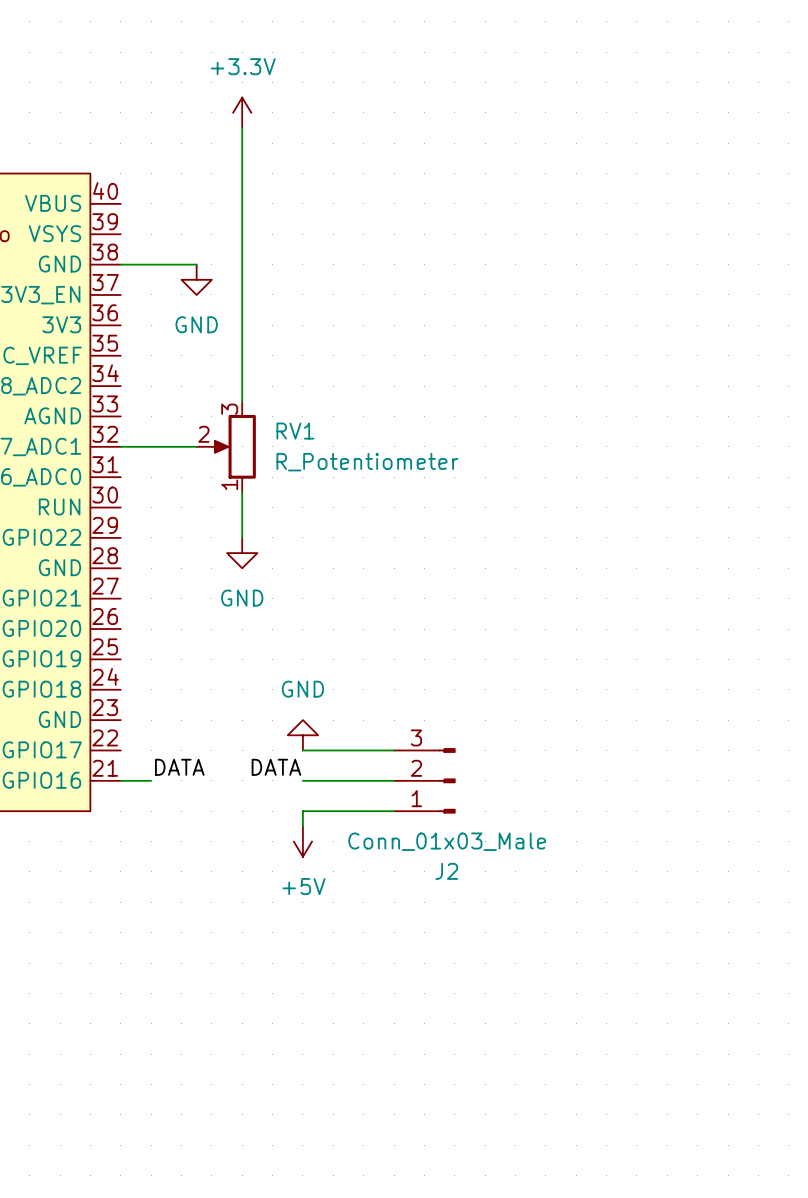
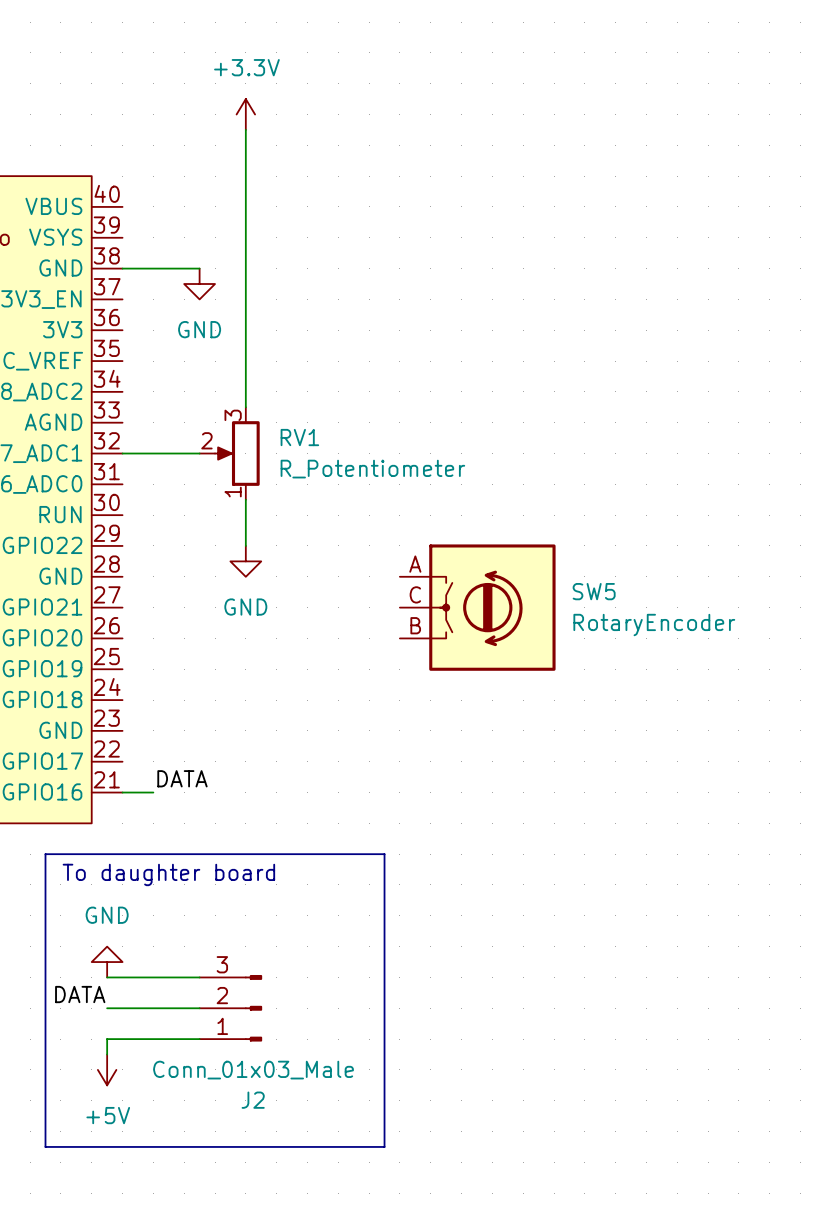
SW5: none -> RotaryEncoder (477, 607)
power symbol position: GND (302, 735) -> GND (107, 962)
wire: (302, 750) (394, 750) -> none
label position: DATA (276, 767) -> DATA (80, 994)
wire: (302, 780) (394, 780) -> (107, 977) (199, 977)
J2 position: (424, 780) -> (230, 1008)
wire: (394, 811) (302, 811) (302, 826) -> (199, 1039) (107, 1039) (107, 1054)
line: none -> (45, 854) (45, 1146) (384, 1146) (384, 854) (45, 854)
power symbol position: +5V (302, 841) -> +5V (107, 1069)
text: none -> To daughter board (168, 874)
wire: none -> (107, 1008) (199, 1008)

